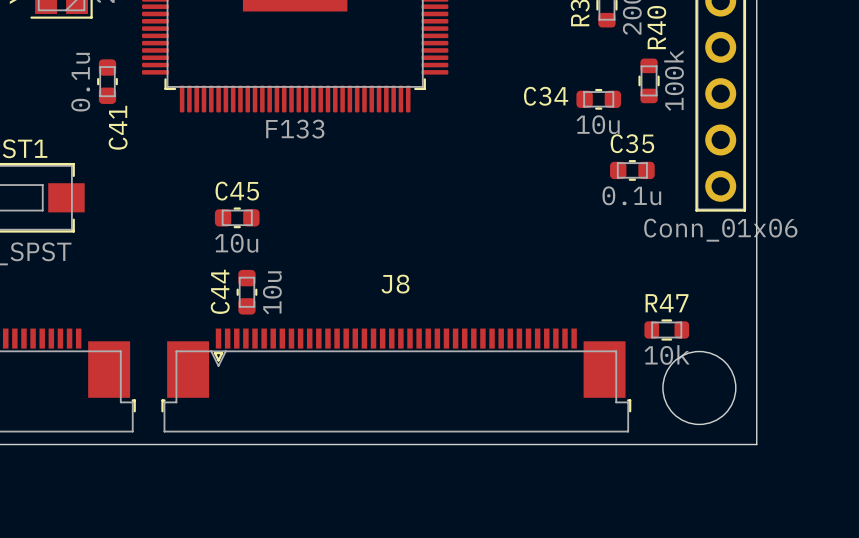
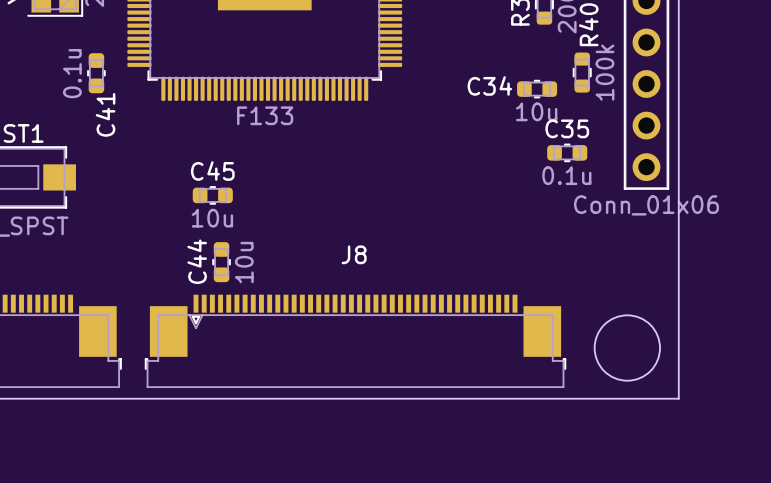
R47: 10k (666, 329) -> none

